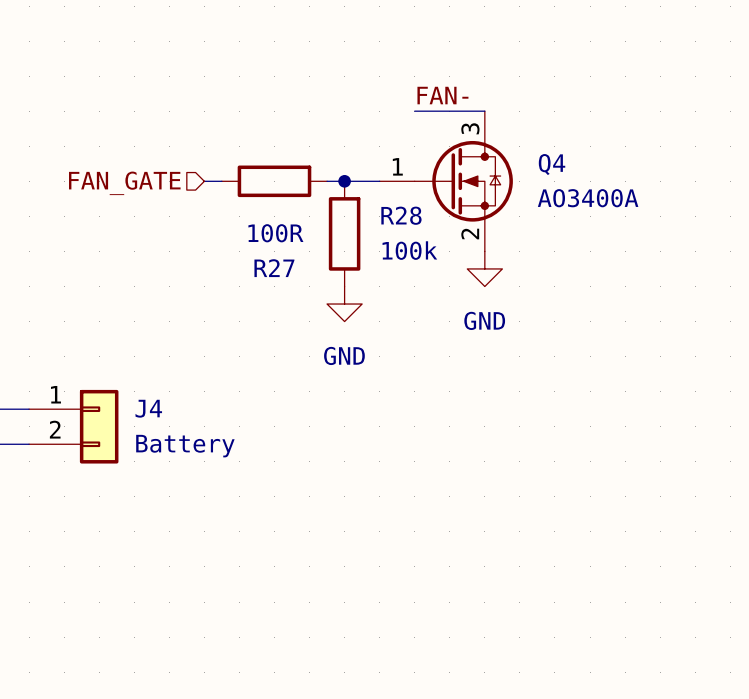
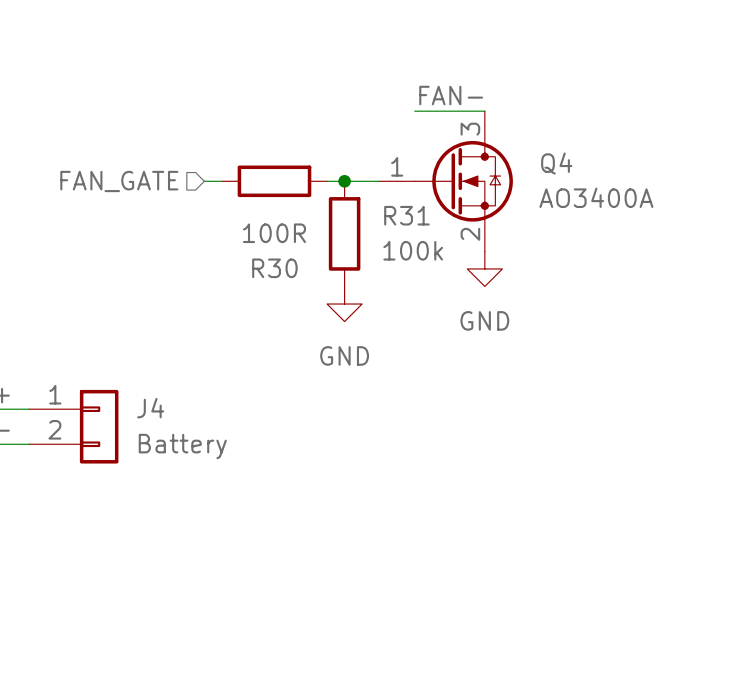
R28 name: R28 (401, 215) -> R31 (406, 215)
R27 name: R27 (274, 268) -> R30 (274, 268)

